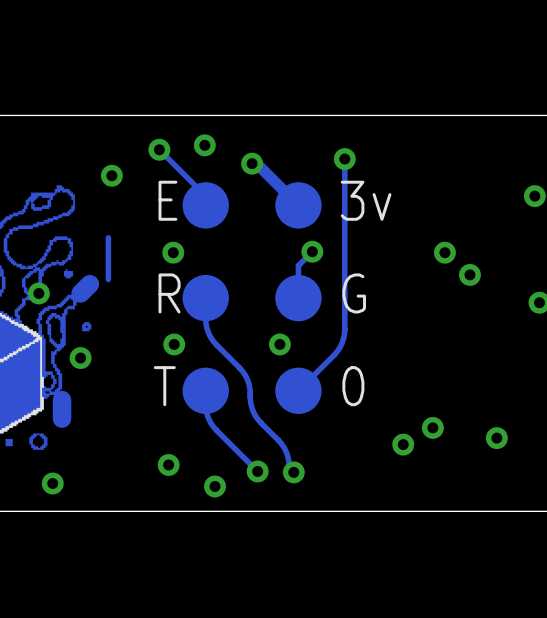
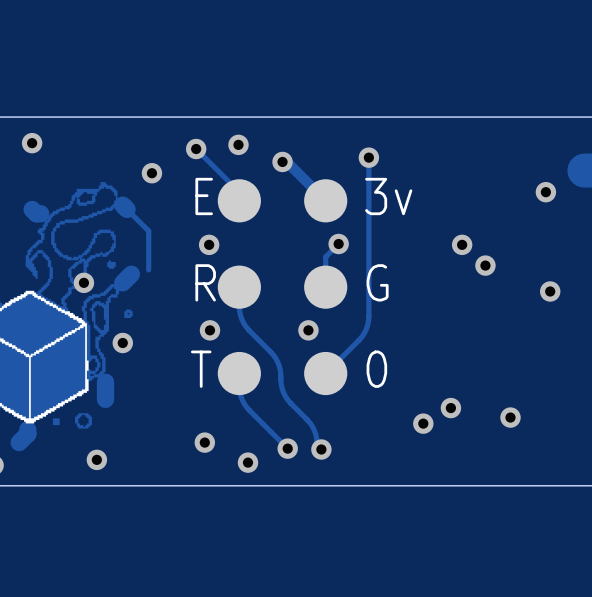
track: none -> (122, 205) (127, 209)
track: none -> (124, 207) (148, 231)

